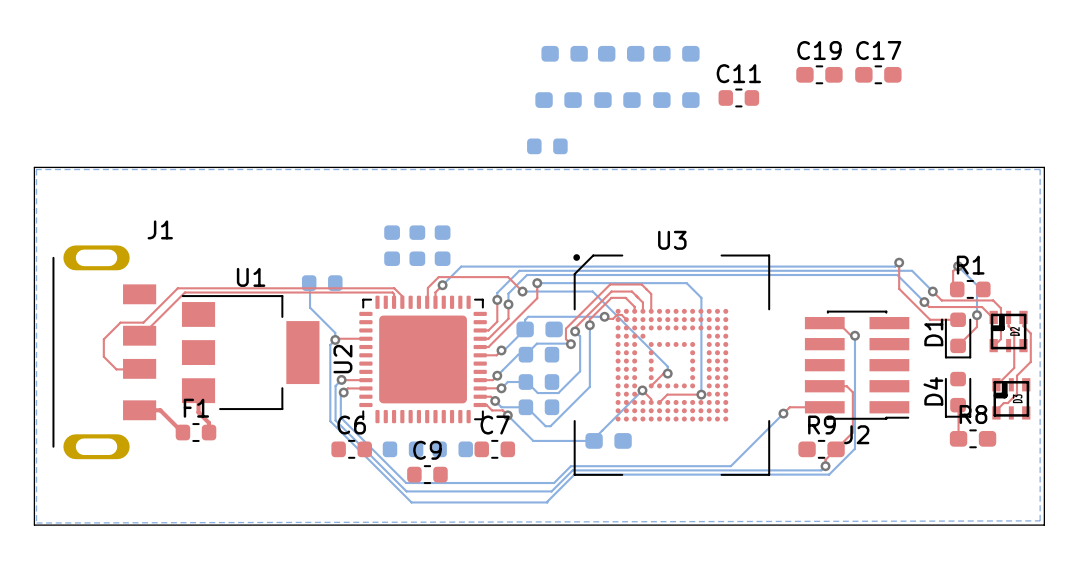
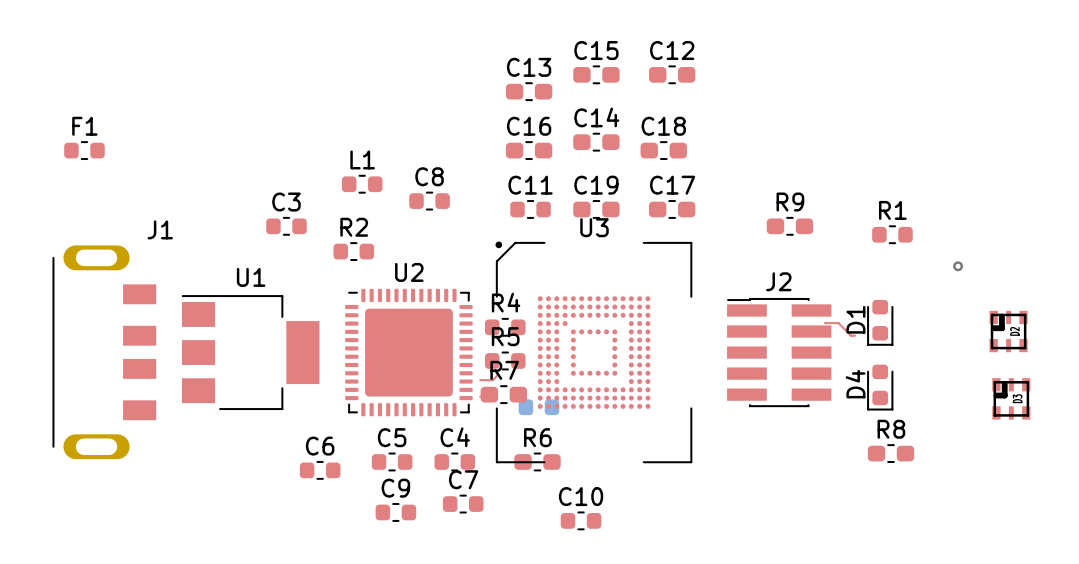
C15 side: bottom (564, 53) -> top (596, 74)
C12 side: bottom (621, 53) -> top (672, 74)
C13 side: bottom (676, 53) -> top (529, 91)
C19 position: (819, 74) -> (596, 209)
C17 position: (878, 74) -> (672, 209)
C11 position: (738, 97) -> (530, 209)
C16 side: bottom (558, 100) -> top (529, 150)
C14 side: bottom (617, 100) -> top (596, 142)
C18 side: bottom (676, 100) -> top (663, 150)
C10 side: bottom (547, 146) -> top (581, 520)
board edge: (34, 167) (1044, 167) (1044, 525) (34, 525) (34, 167) -> none
bottom zone outline: (36, 169) (36, 522) (1040, 520) (1040, 169) (36, 169) -> none
R2 side: bottom (392, 245) -> top (353, 251)
L1 side: bottom (417, 245) -> top (362, 184)
C8 side: bottom (442, 245) -> top (429, 201)
top track: (899, 262) (899, 288) (930, 319) (958, 319) -> none
bottom track: (899, 262) (895, 266) (461, 266) (442, 285) -> none
via: (899, 262) -> none
top track: (958, 266) (953, 271) (953, 284) (958, 291) -> none
bottom track: (958, 266) (976, 285) (976, 315) -> none
bottom track: (310, 283) (310, 307) (335, 332) (335, 339) (330, 344) (330, 421) (411, 502) (547, 502) (574, 474) (829, 474) (854, 448) (854, 335) -> none
C3 side: bottom (322, 283) -> top (286, 226)
top track: (537, 283) (537, 298) (488, 347) (480, 347) -> none
bottom track: (537, 283) (686, 283) (701, 297) (701, 394) -> none
via: (537, 283) -> none
top track: (442, 285) (435, 292) (435, 302) -> none
via: (442, 285) -> none
R1 position: (970, 289) -> (892, 234)
top track: (522, 291) (508, 277) (438, 277) (427, 287) (427, 304) -> none
bottom track: (522, 291) (592, 291) (667, 366) (667, 373) -> none
via: (522, 291) -> none
top track: (932, 291) (941, 300) (993, 300) (1000, 308) (1000, 339) (993, 346) -> none
bottom track: (932, 291) (912, 270) (519, 270) (497, 292) (497, 299) -> none
via: (932, 291) -> none
top track: (497, 299) (497, 321) (488, 330) (480, 330) -> none
via: (497, 299) -> none
top track: (394, 302) (392, 292) (184, 292) (139, 337) -> none
top track: (402, 302) (402, 296) (394, 288) (177, 288) (143, 322) (120, 322) (103, 339) (103, 356) (116, 369) (139, 369) -> none
top track: (924, 302) (929, 307) (981, 307) (993, 318) -> none
bottom track: (924, 302) (897, 275) (527, 275) (508, 293) (508, 304) -> none
via: (924, 302) -> none
top track: (508, 304) (508, 318) (488, 338) (480, 338) -> none
via: (508, 304) -> none
top track: (634, 311) (634, 306) (625, 297) (611, 297) (589, 319) (589, 325) -> none
top track: (642, 311) (642, 302) (631, 291) (611, 291) (575, 327) (575, 331) -> none
top track: (651, 311) (651, 293) (641, 284) (610, 284) (565, 328) (565, 339) (570, 344) -> none
top track: (976, 315) (976, 326) (958, 345) -> none
via: (976, 315) -> none
top track: (604, 316) (606, 318) (613, 318) (617, 314) (621, 314) (626, 319) -> none
bottom track: (604, 316) (528, 316) (525, 319) (525, 329) (504, 350) (501, 350) -> none
via: (604, 316) -> none
top track: (1008, 317) (1008, 326) (1014, 331) (1014, 367) (995, 386) -> none
top track: (1023, 317) (1023, 326) (1030, 333) (1030, 361) (1017, 375) (1017, 393) (1007, 403) (1003, 403) (996, 412) -> none
bottom track: (589, 325) (589, 386) (550, 426) (545, 426) (526, 407) -> none
via: (589, 325) -> none
R7 side: bottom (539, 329) -> top (503, 394)
bottom track: (575, 331) (580, 336) (580, 371) (558, 393) (537, 393) (526, 382) -> none
via: (575, 331) -> none
via: (854, 335) -> none
D1 position: (958, 335) -> (880, 322)
top track: (365, 338) (335, 339) -> none
via: (335, 339) -> none
bottom track: (570, 344) (536, 343) (525, 354) -> none
via: (570, 344) -> none
top track: (501, 350) (496, 355) (480, 355) -> none
via: (501, 350) -> none
bottom track: (524, 354) (518, 354) (497, 375) -> none
R5 side: bottom (538, 354) -> top (505, 360)
U2 rotation: 0° (423, 359) -> 90° clockwise (408, 352)
U3 position: (671, 365) -> (593, 352)
J2 rotation: 0° (857, 365) -> 180° (779, 352)
J2 position: (857, 365) -> (779, 352)
top track: (667, 373) (663, 373) (651, 385) -> none
via: (667, 373) -> none
via: (497, 375) -> none
top track: (341, 379) (365, 380) -> none
bottom track: (341, 379) (335, 385) (335, 420) (406, 491) (551, 491) (572, 470) (821, 470) (825, 466) -> none
via: (341, 379) -> none
bottom track: (525, 382) (507, 382) (501, 388) -> none
R4 side: bottom (538, 382) -> top (505, 327)
top track: (824, 386) (846, 386) (852, 392) (852, 432) (825, 459) (825, 466) -> none
top track: (365, 388) (347, 388) (343, 392) -> none
top track: (478, 388) (501, 388) -> none
via: (501, 388) -> none
top track: (642, 390) (651, 399) (651, 402) -> none
bottom track: (642, 390) (589, 443) -> none
via: (642, 390) -> none
top track: (198, 392) (198, 412) (209, 422) (209, 432) -> none
bottom track: (343, 392) (340, 395) (340, 417) (406, 483) (554, 483) (570, 466) (730, 466) (783, 413) -> none
via: (343, 392) -> none
top track: (701, 394) (667, 394) (659, 402) -> none
via: (701, 394) -> none
D4 position: (958, 394) -> (880, 387)
bottom track: (495, 400) (501, 407) (525, 407) -> none
via: (495, 400) -> none
top track: (480, 405) (486, 405) (492, 410) (502, 410) (507, 415) -> none
top track: (958, 405) (958, 438) -> none
top track: (825, 407) (789, 407) (783, 413) -> none
top track: (139, 410) (160, 410) (183, 432) -> none
via: (783, 413) -> none
bottom track: (507, 415) (533, 440) (594, 440) -> none
via: (507, 415) -> none
F1 position: (195, 432) -> (84, 150)
R8 position: (973, 438) -> (890, 453)
R6 side: bottom (608, 440) -> top (537, 461)
C6 position: (351, 449) -> (320, 470)
C5 side: bottom (403, 449) -> top (392, 461)
C4 side: bottom (452, 449) -> top (454, 461)
C7 position: (494, 449) -> (463, 504)
R9 position: (821, 449) -> (789, 226)
via: (825, 466) -> none
C9 position: (427, 474) -> (395, 512)

